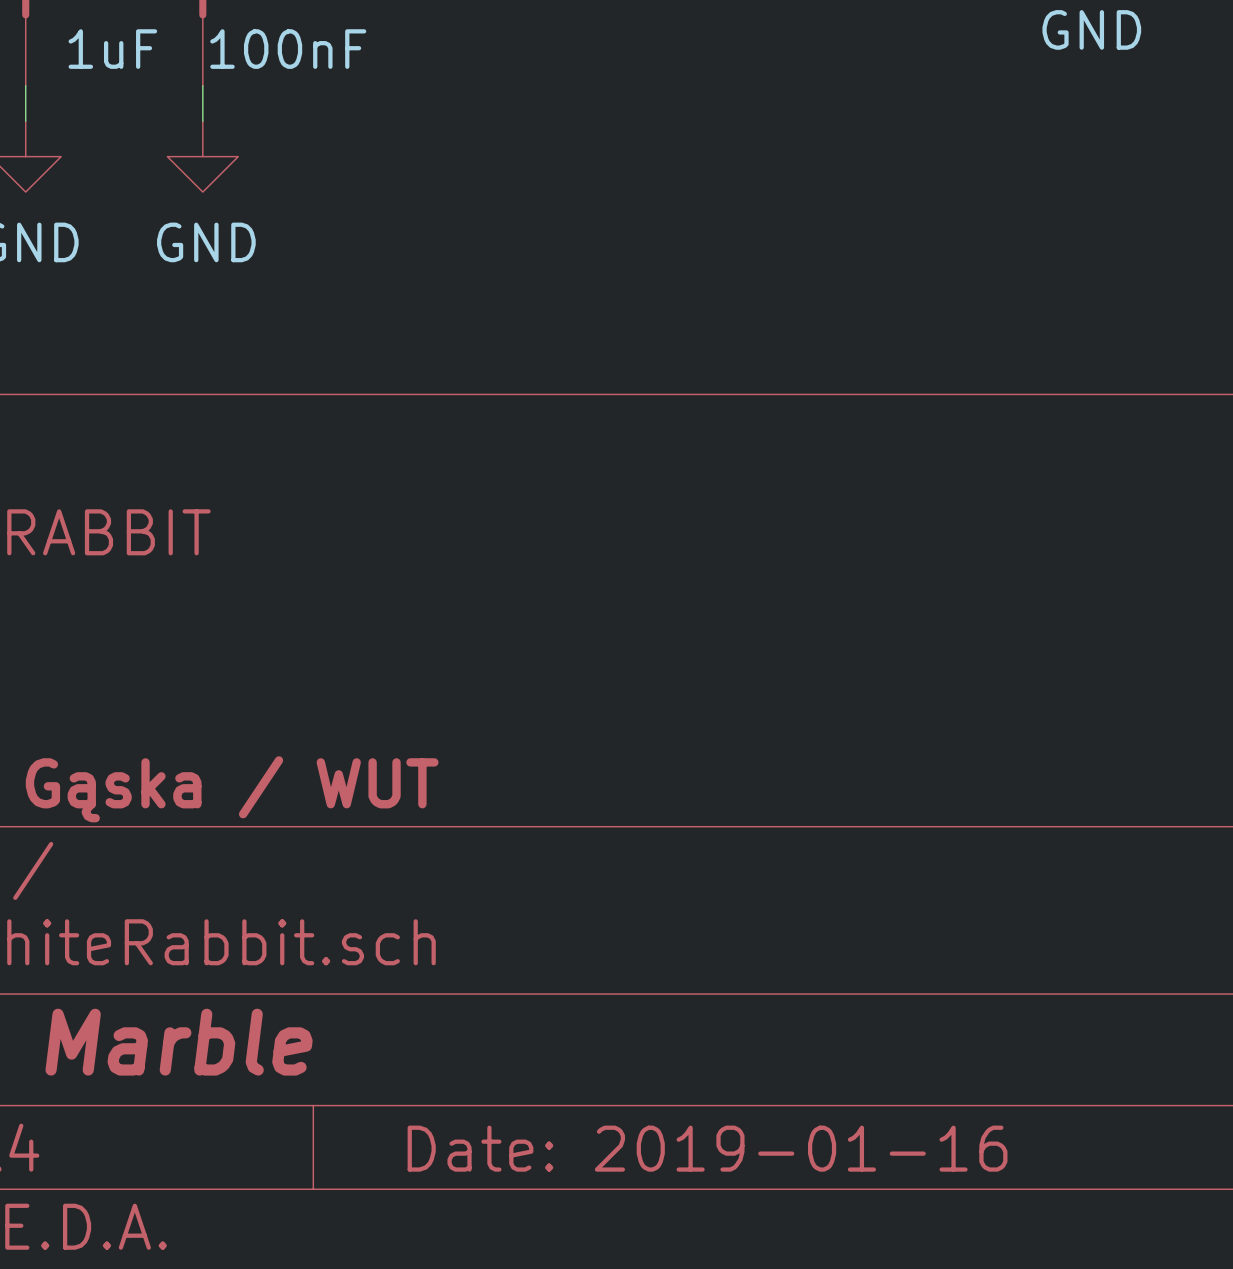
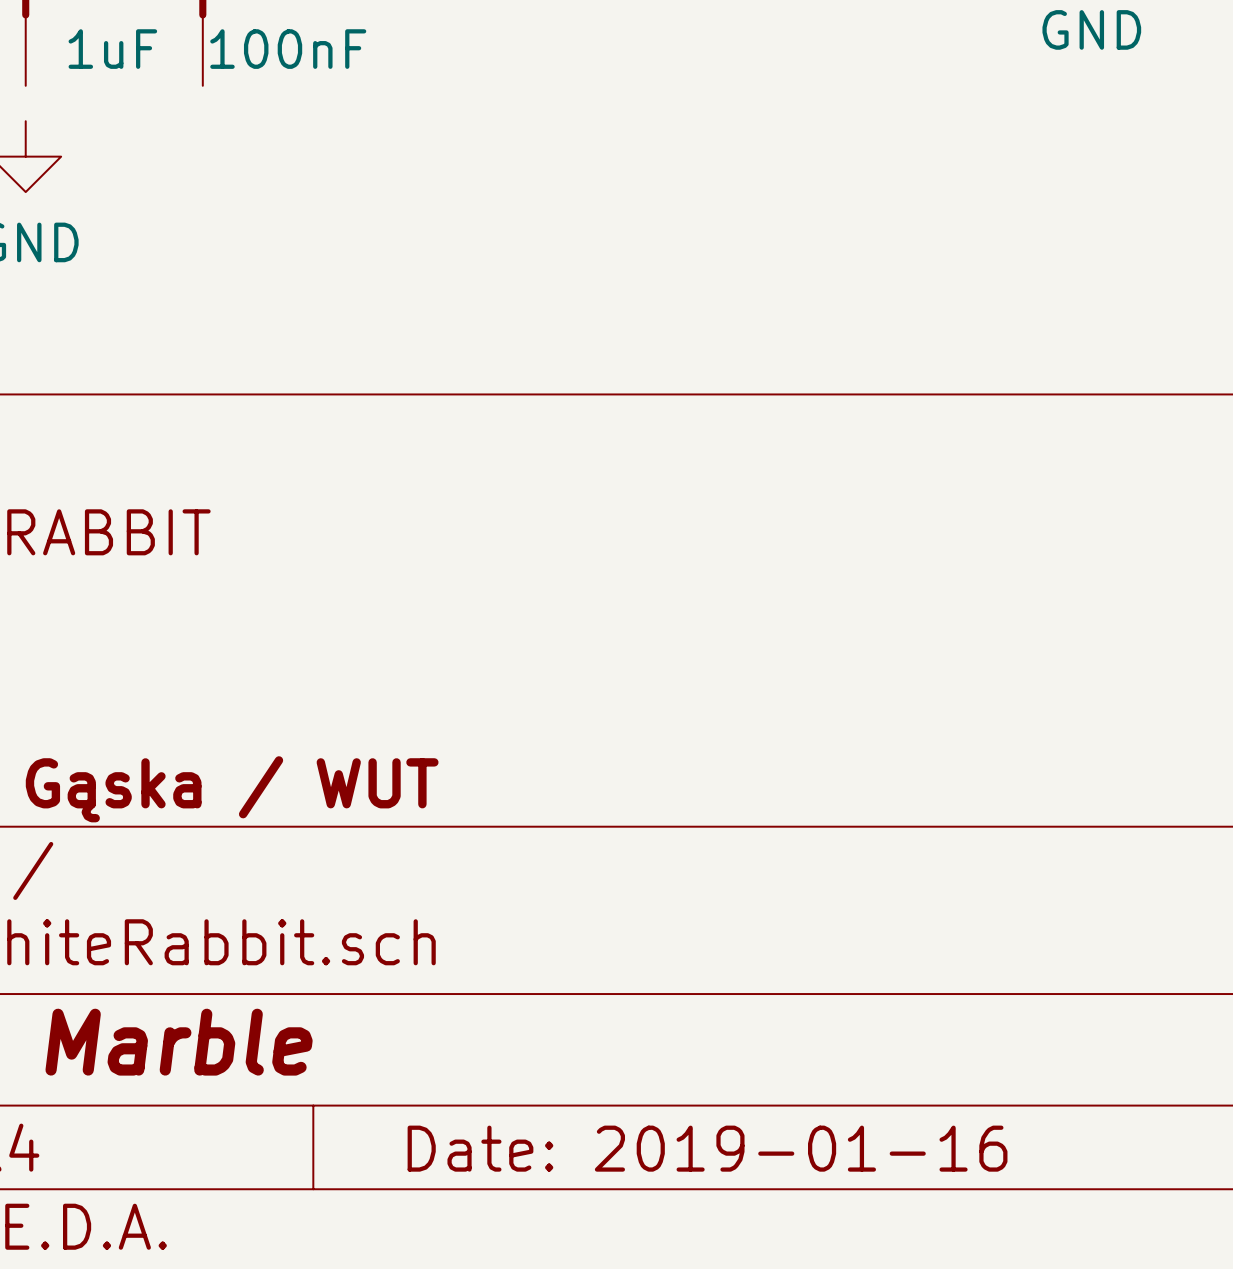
wire: (25, 85) (25, 121) -> none
wire: (202, 85) (202, 121) -> none
power symbol: GND (202, 156) -> none

